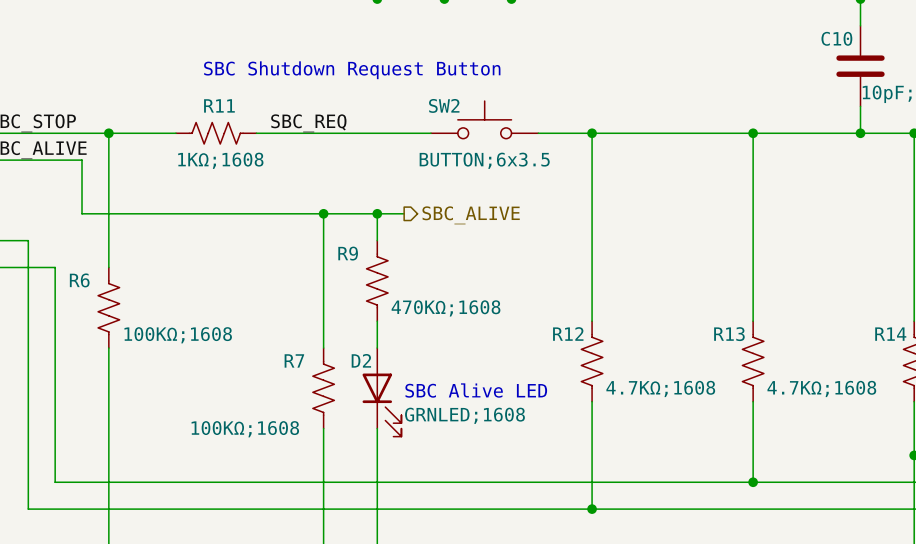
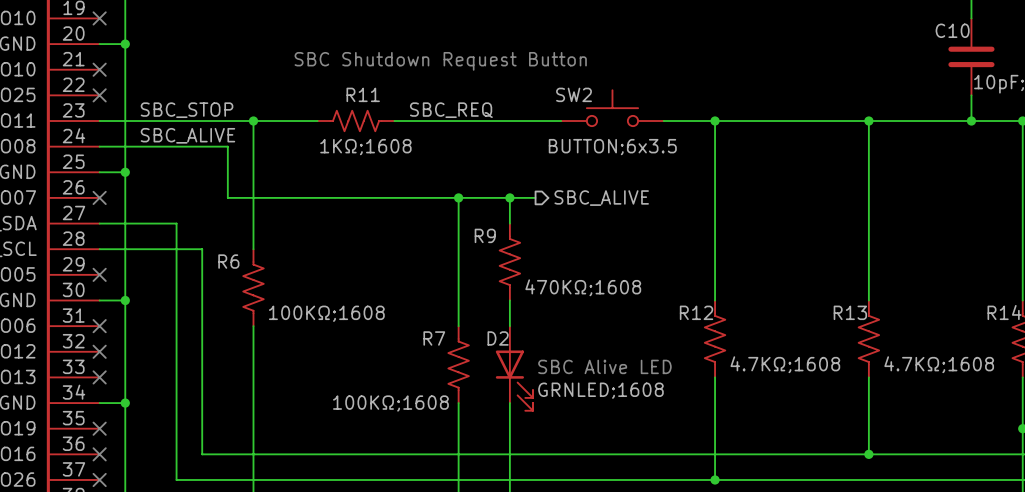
text position: SBC Shutdown Request Button (352, 70) -> SBC Shutdown Request Button (440, 61)

